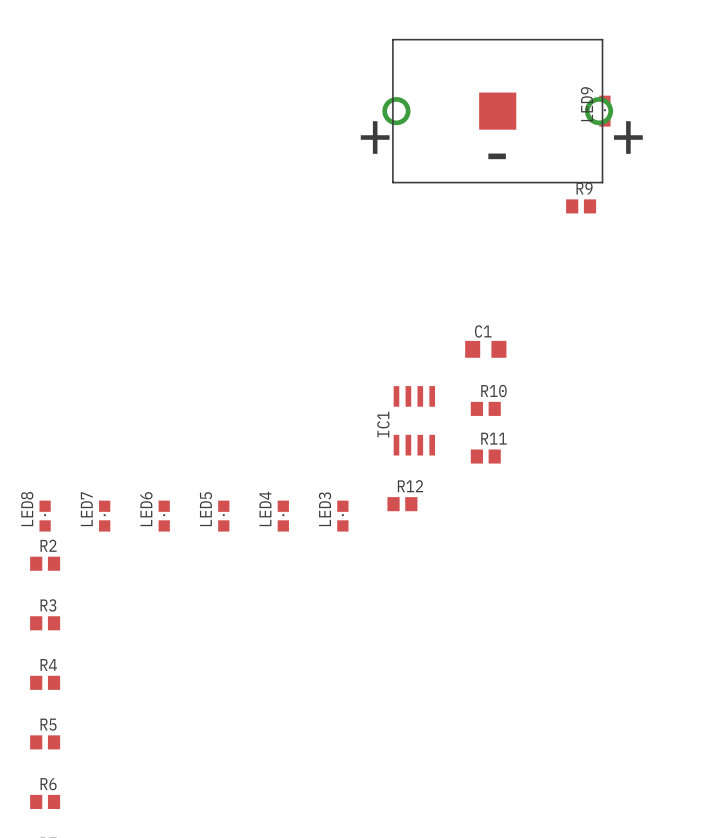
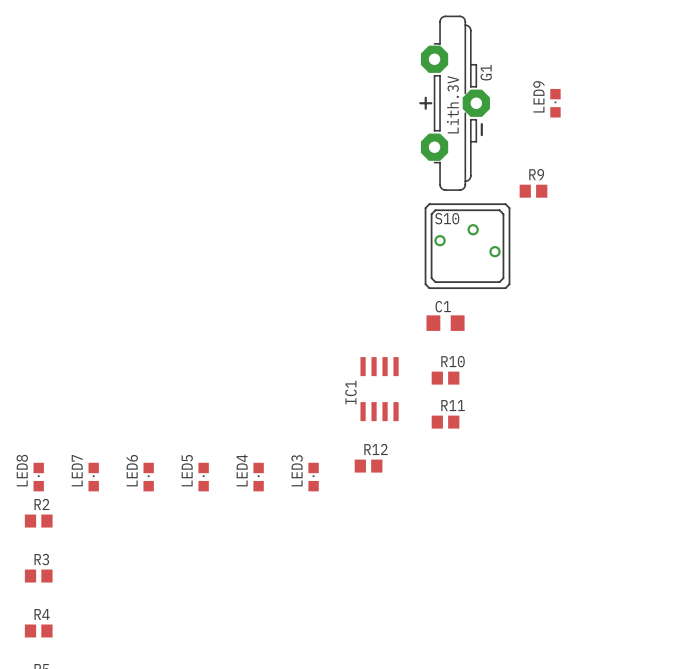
G1: none -> (454, 103)
part: (497, 111) -> none
S10: none -> (467, 246)

